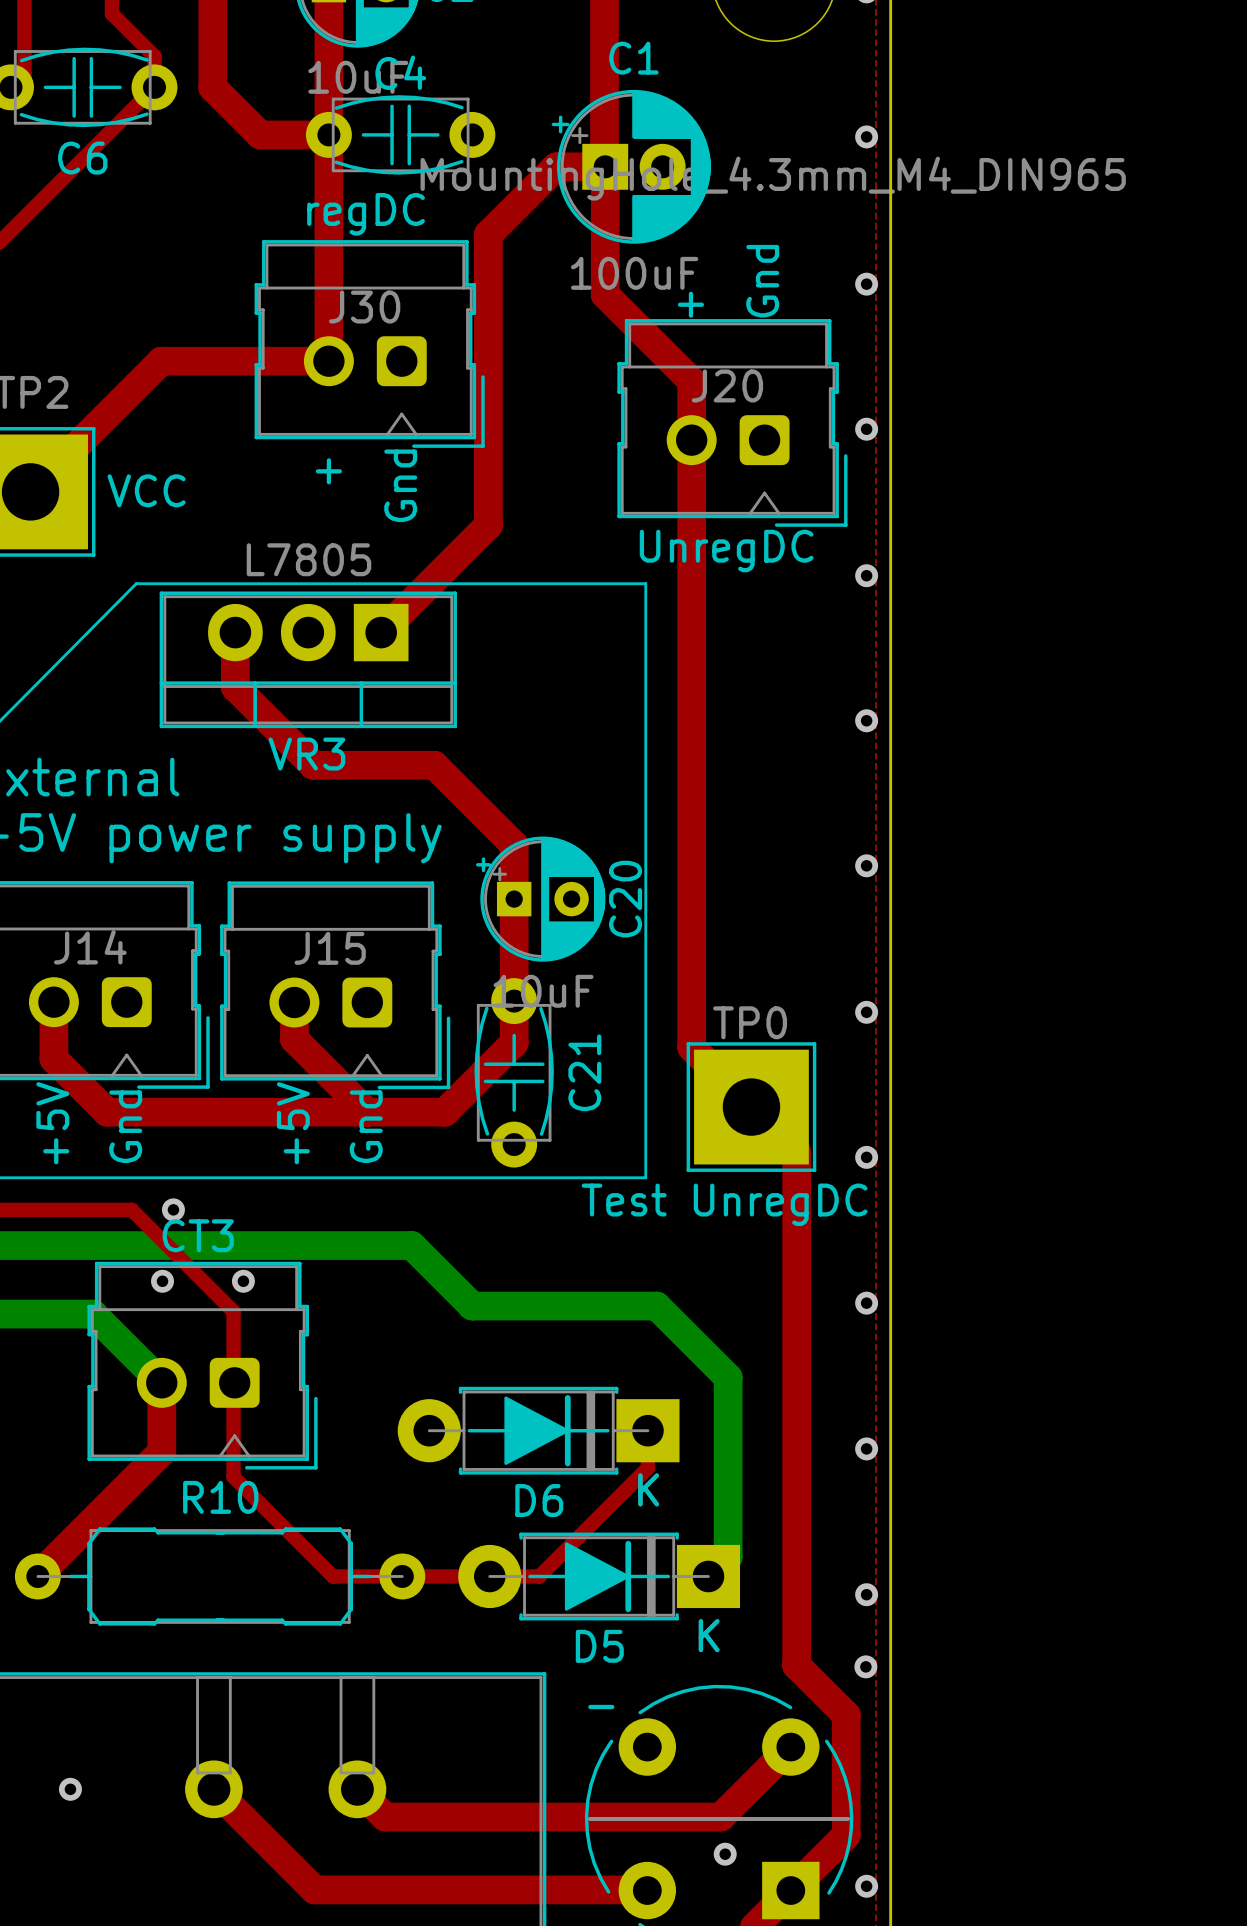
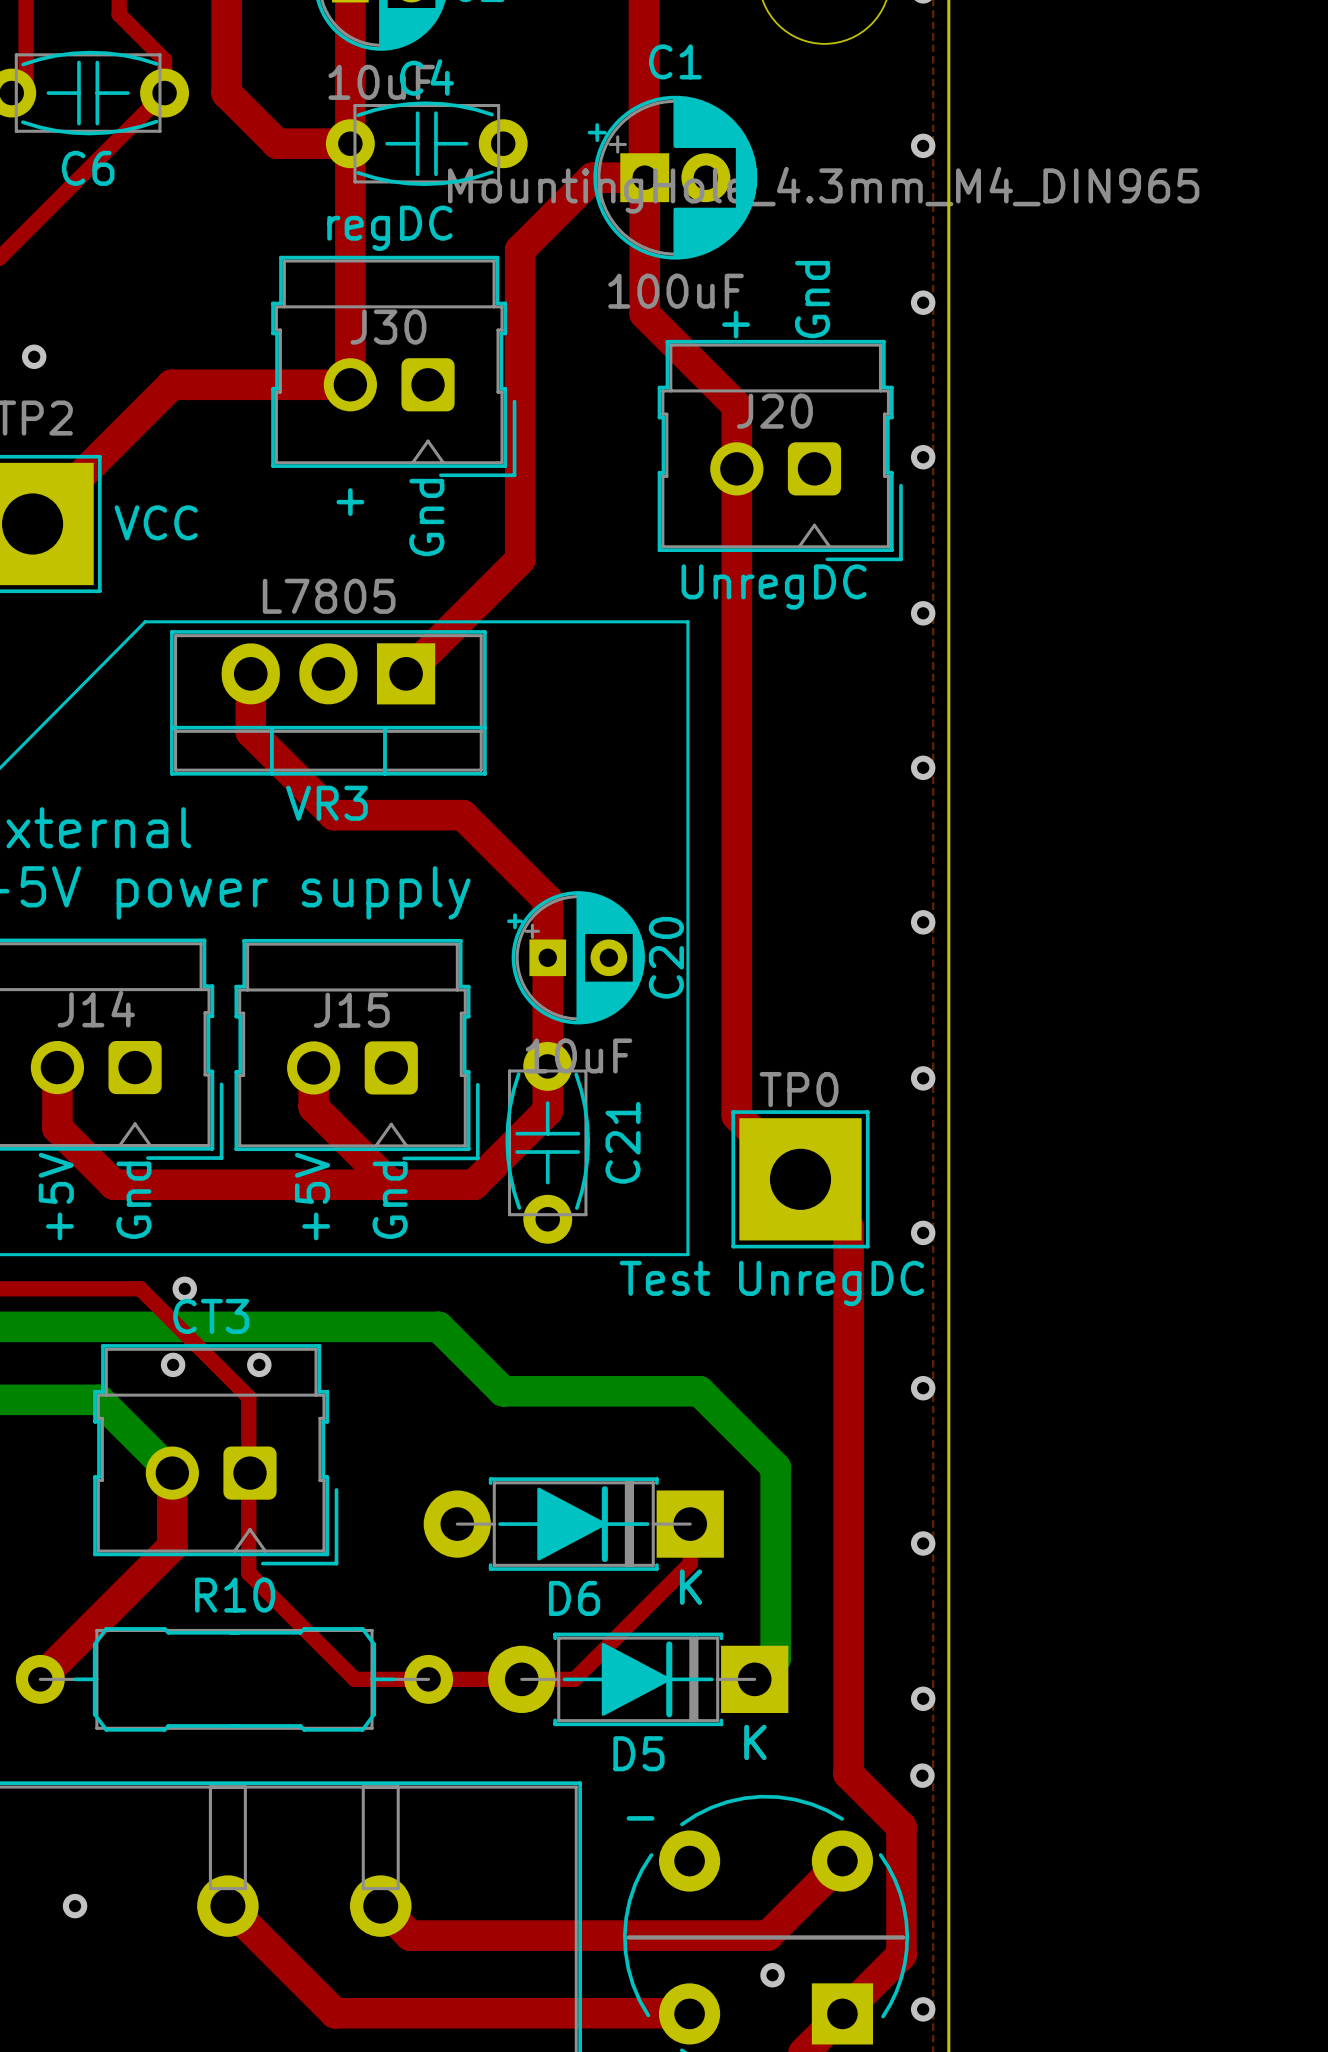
via: none -> (34, 356)

